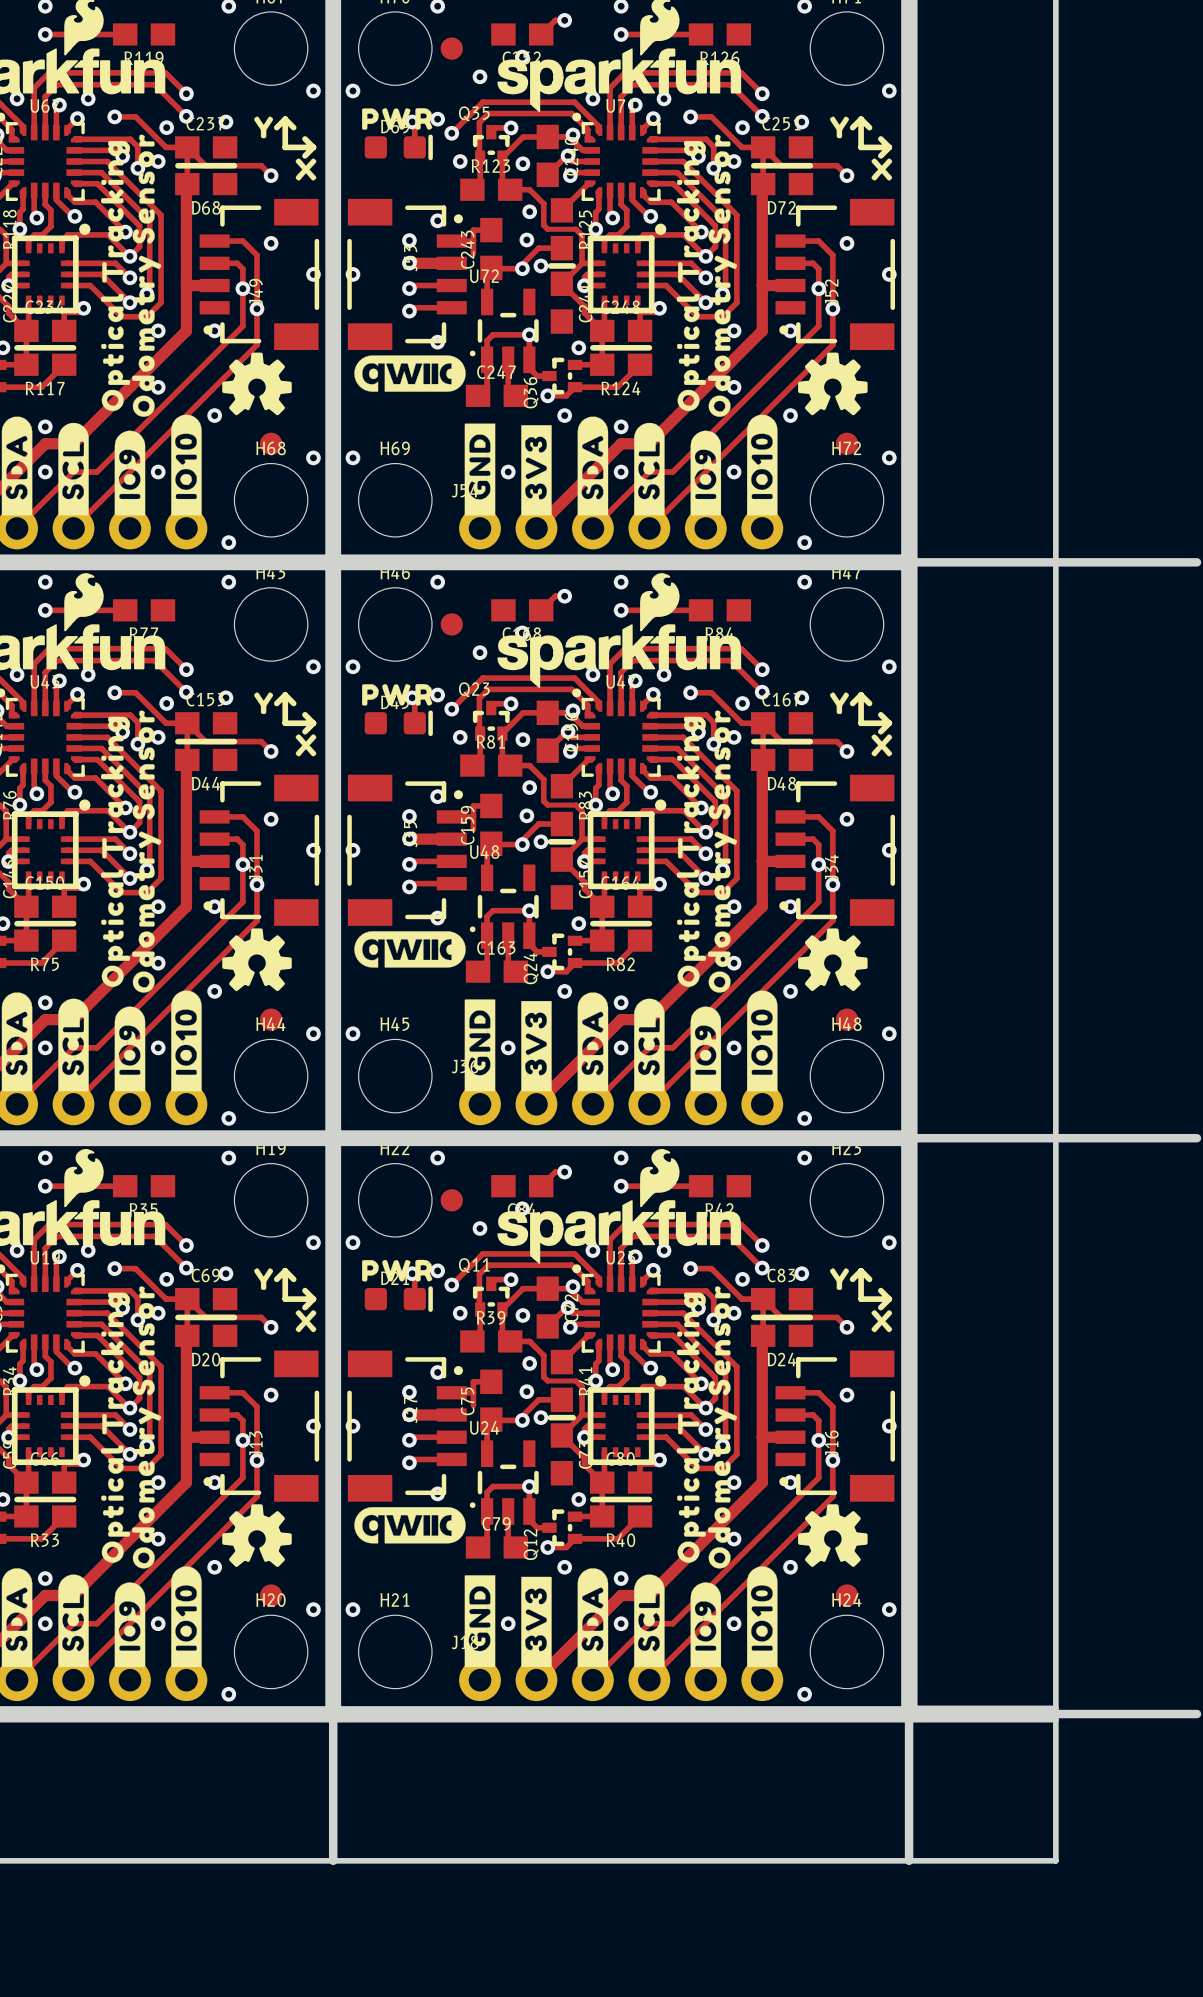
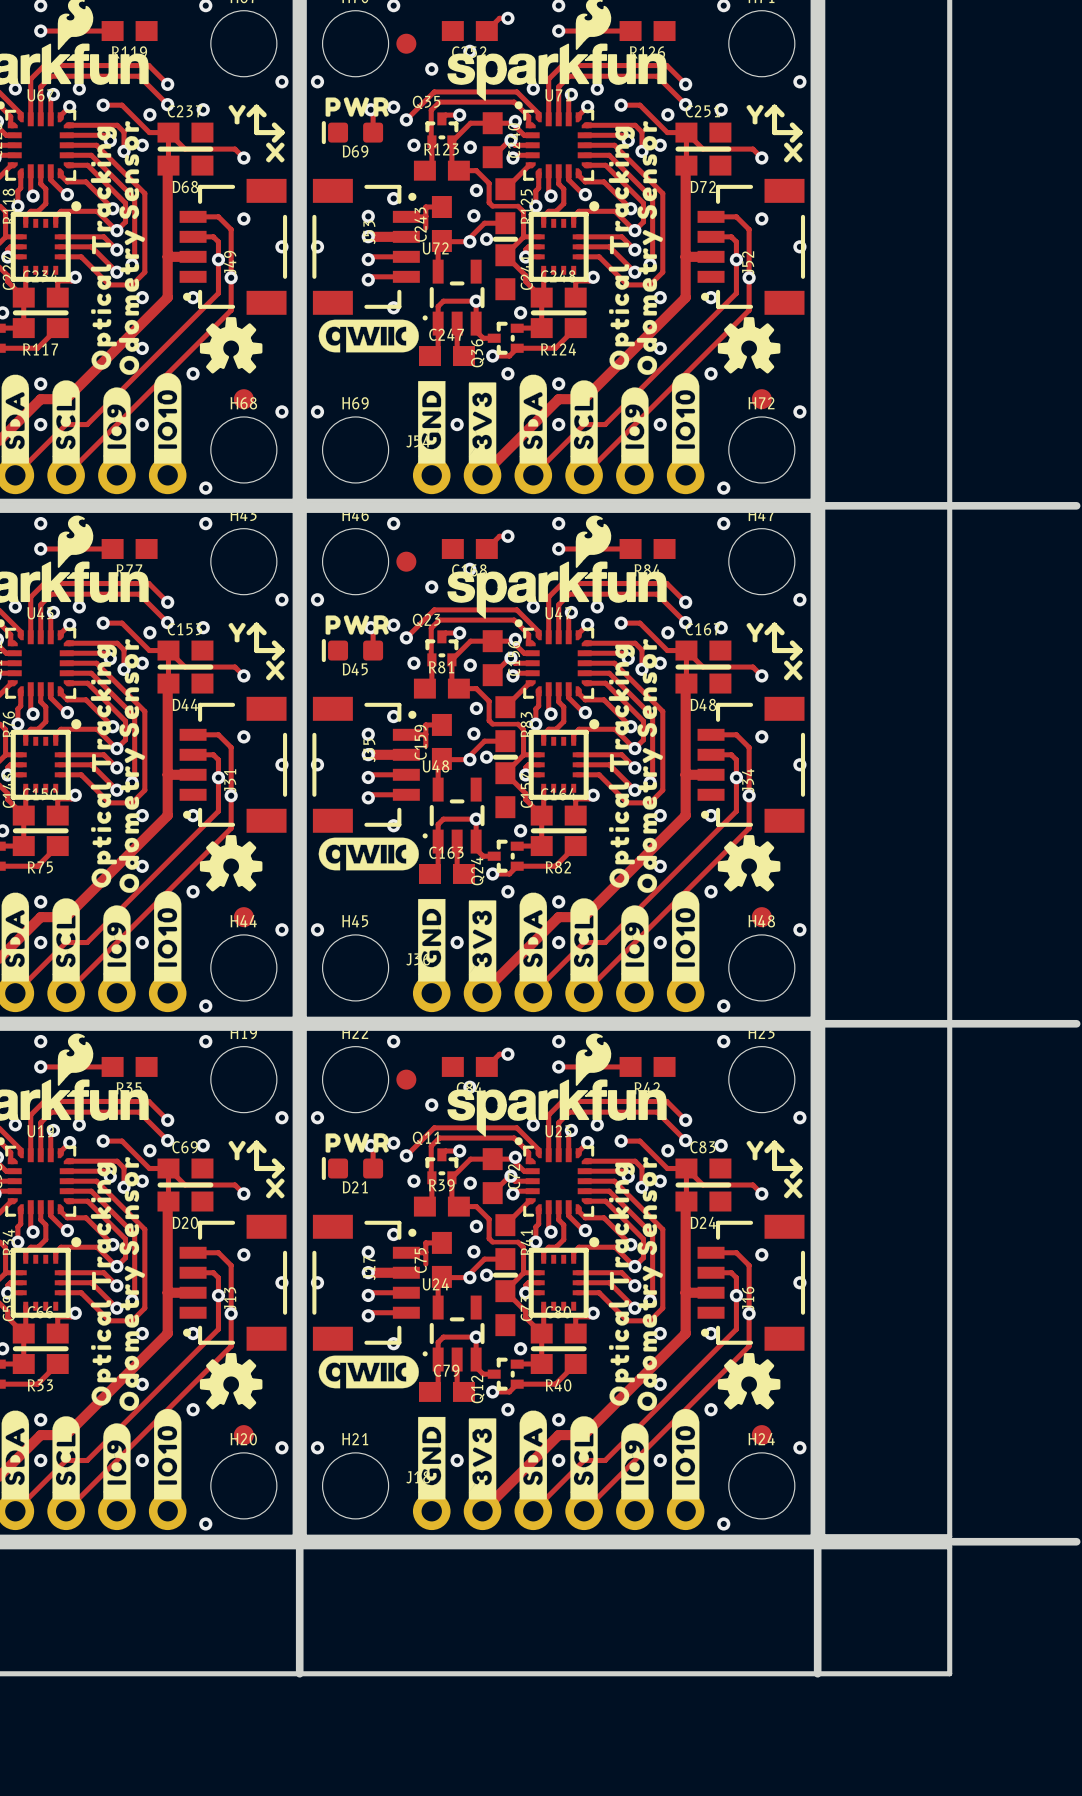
D69 rotation: 0° (398, 147) -> 180° (352, 132)
D45 rotation: 0° (398, 723) -> 180° (352, 650)
D21 rotation: 0° (398, 1299) -> 180° (352, 1168)

